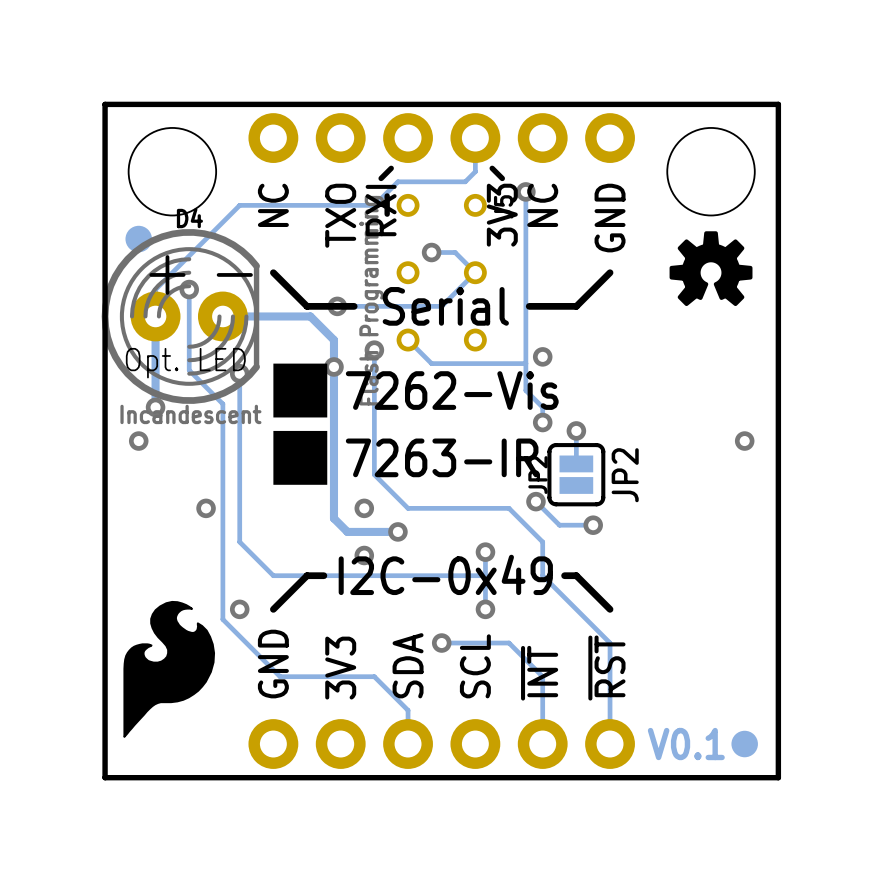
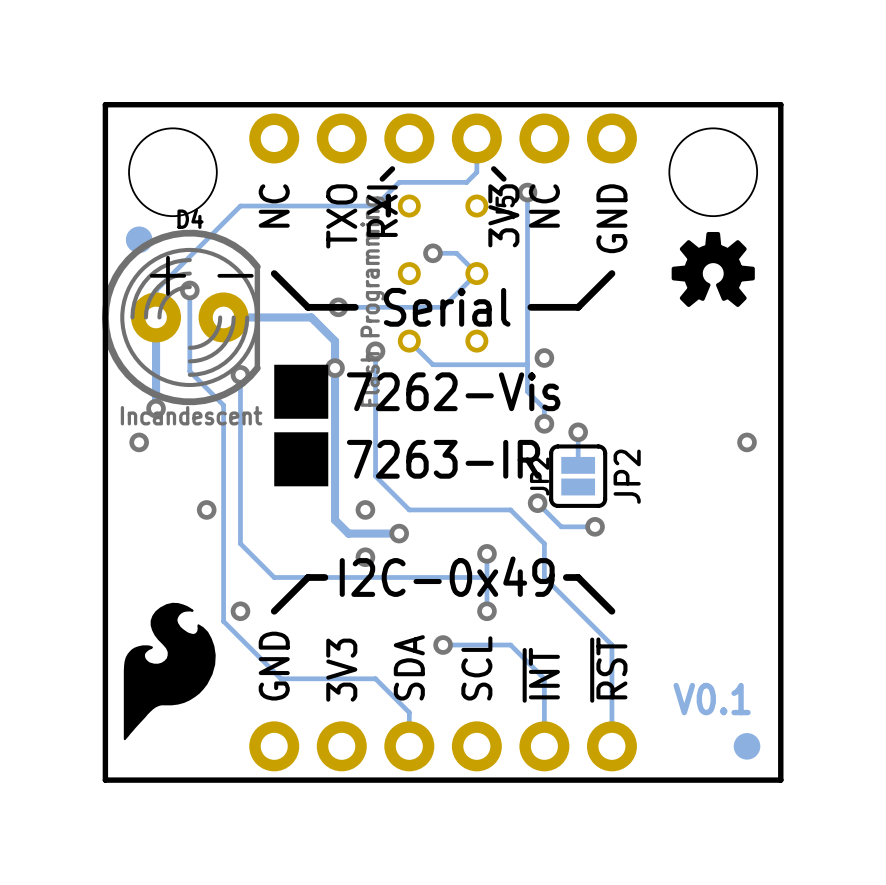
text: Opt. LED (185, 363) -> none
text position: V0.1 (686, 744) -> V0.1 (712, 699)

